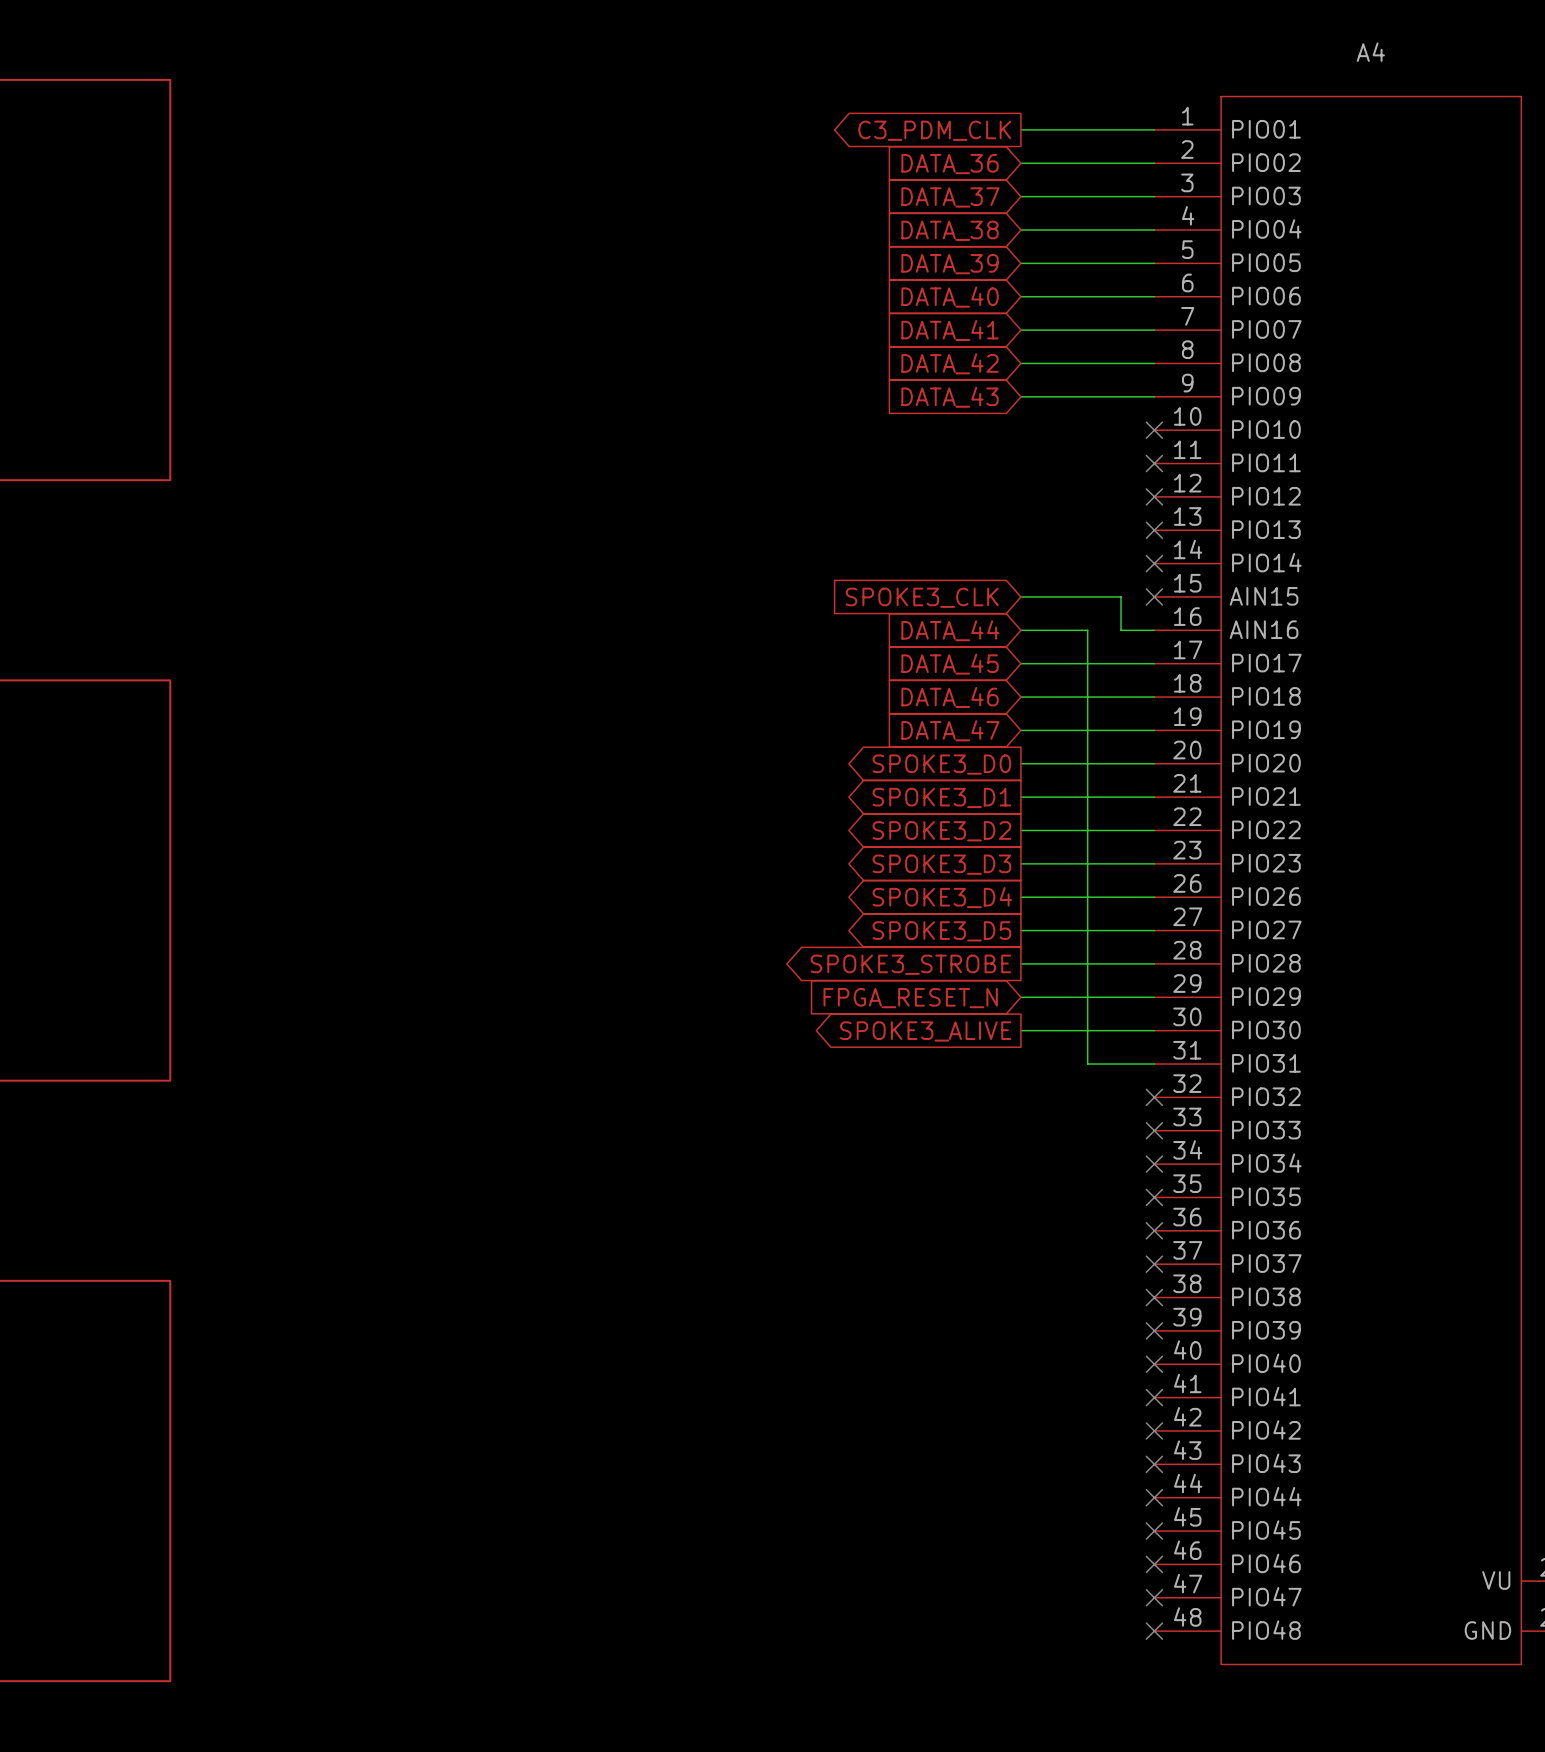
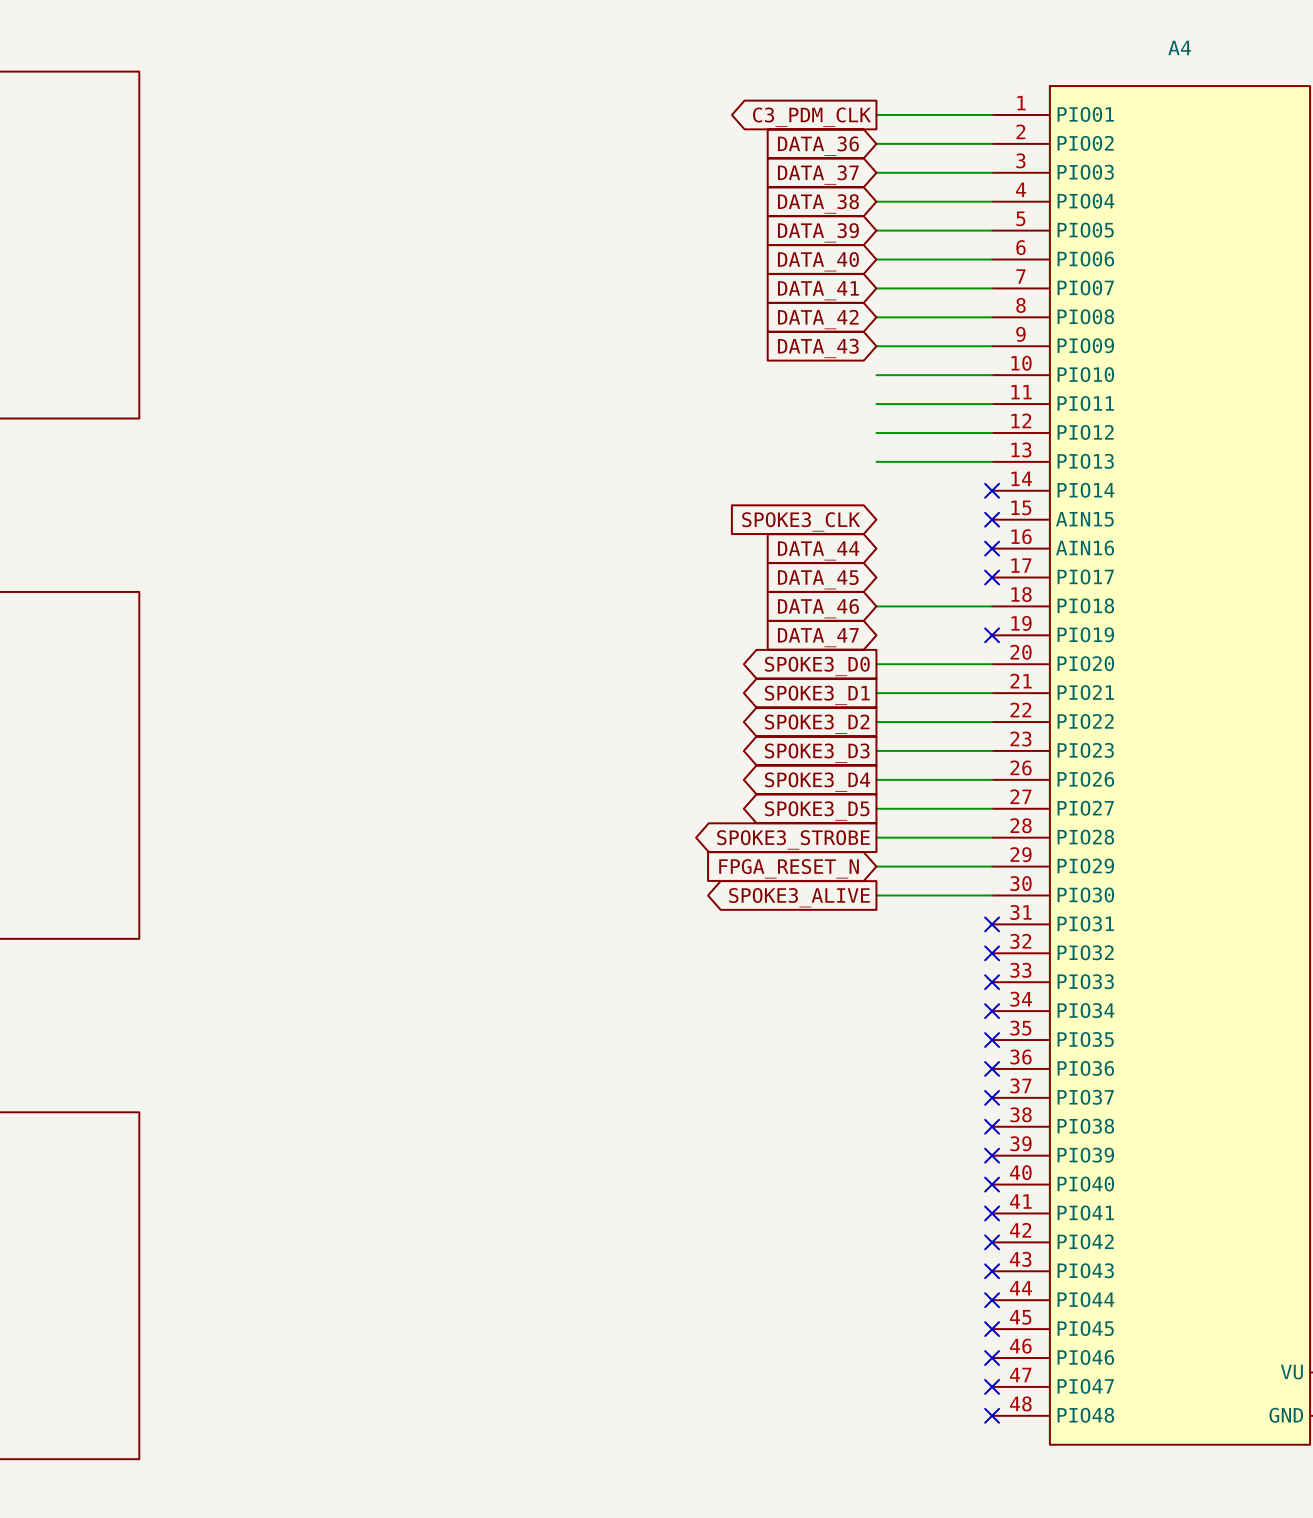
wire: none -> (876, 375) (992, 375)
no-connect mark: (1154, 430) -> none
no-connect mark: (1154, 463) -> none
wire: none -> (876, 432) (992, 432)
no-connect mark: (1154, 496) -> none
no-connect mark: (1154, 530) -> none
wire: (1020, 596) (1121, 596) (1121, 630) (1154, 630) -> none
wire: (1020, 630) (1087, 630) (1087, 1064) (1154, 1064) -> none
no-connect mark: none -> (992, 548)
wire: (1020, 663) (1154, 663) -> (876, 404) (992, 404)
no-connect mark: none -> (992, 577)
wire: (1020, 730) (1154, 730) -> (876, 461) (992, 461)
no-connect mark: none -> (992, 635)
no-connect mark: none -> (992, 924)

